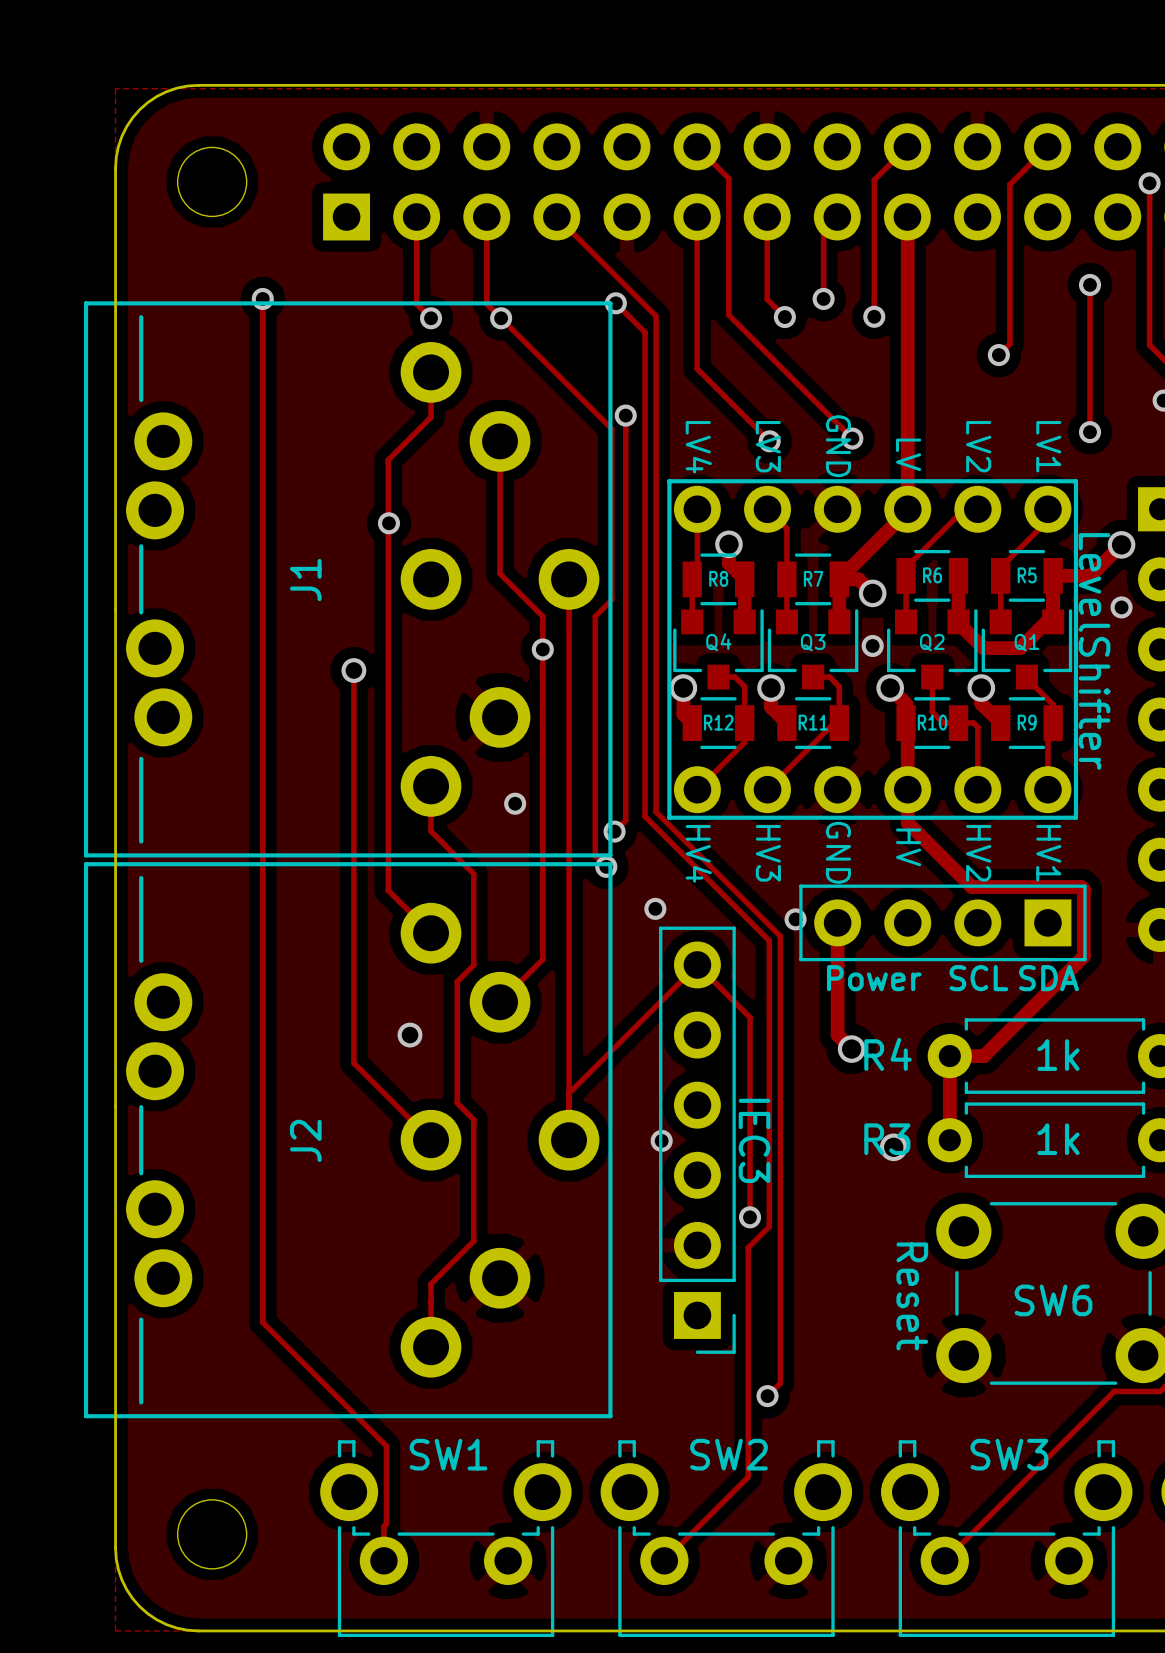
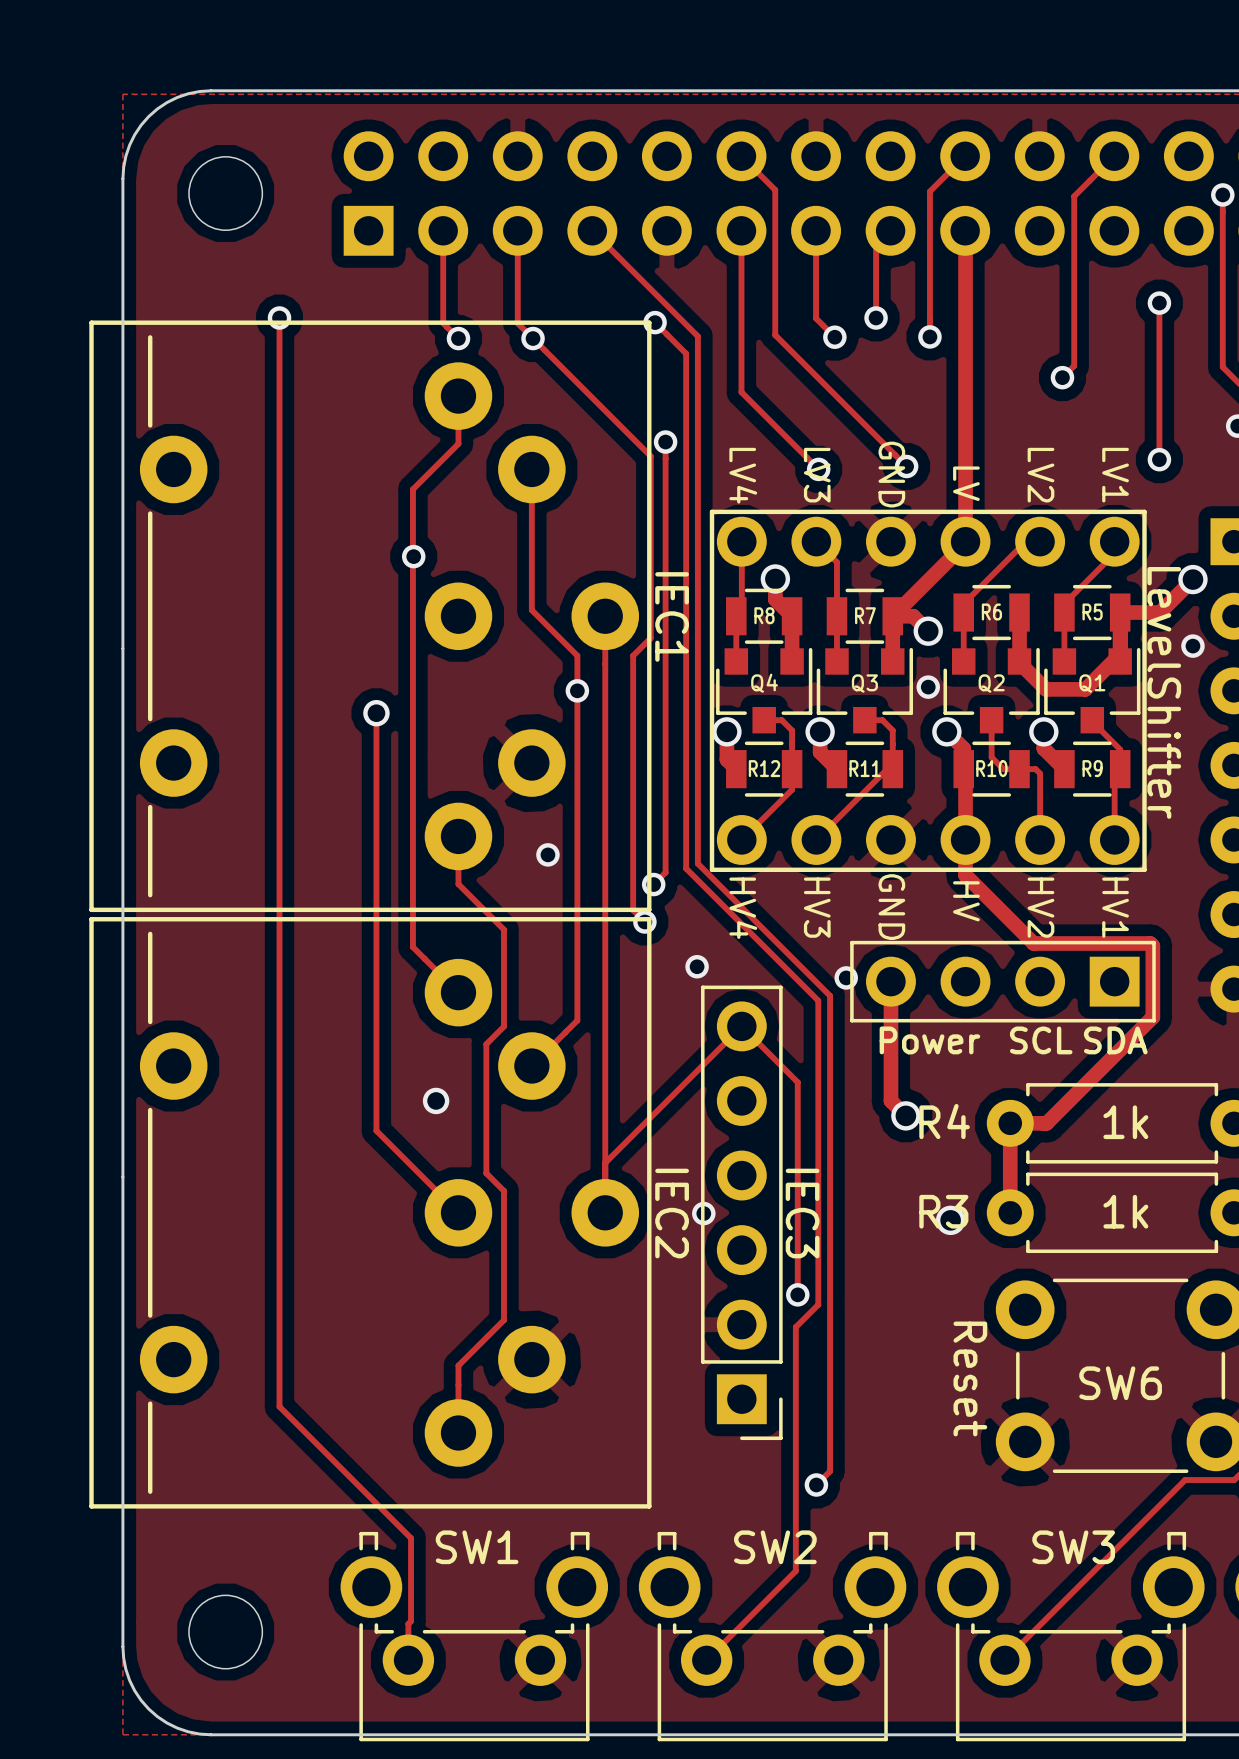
J1: (348, 579) -> none
part: none -> IEC1 (370, 616)
J2: (348, 1140) -> none
part: none -> IEC2 (370, 1212)

